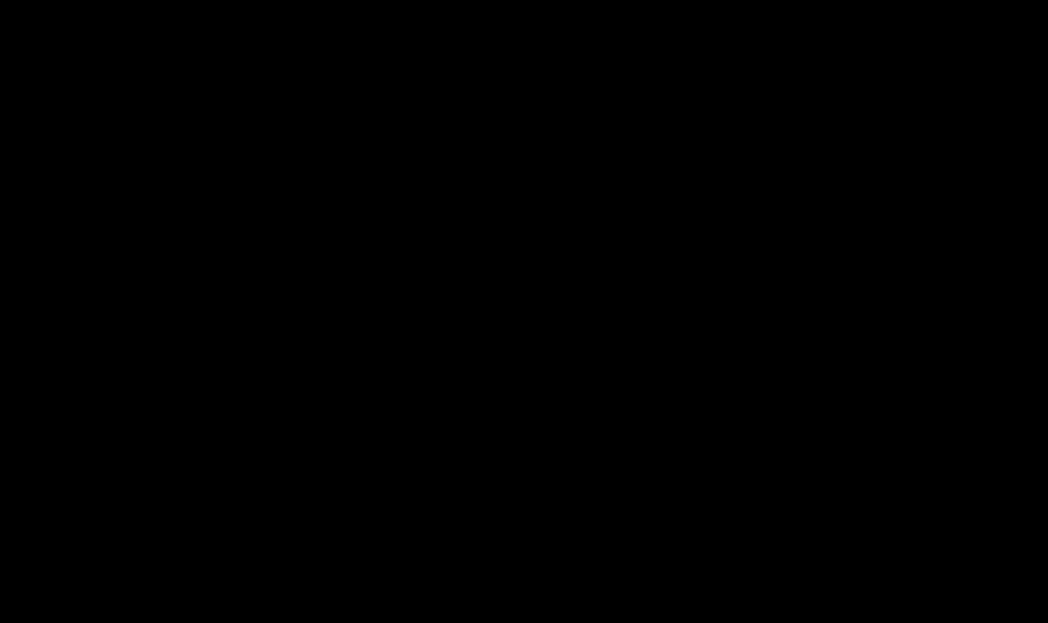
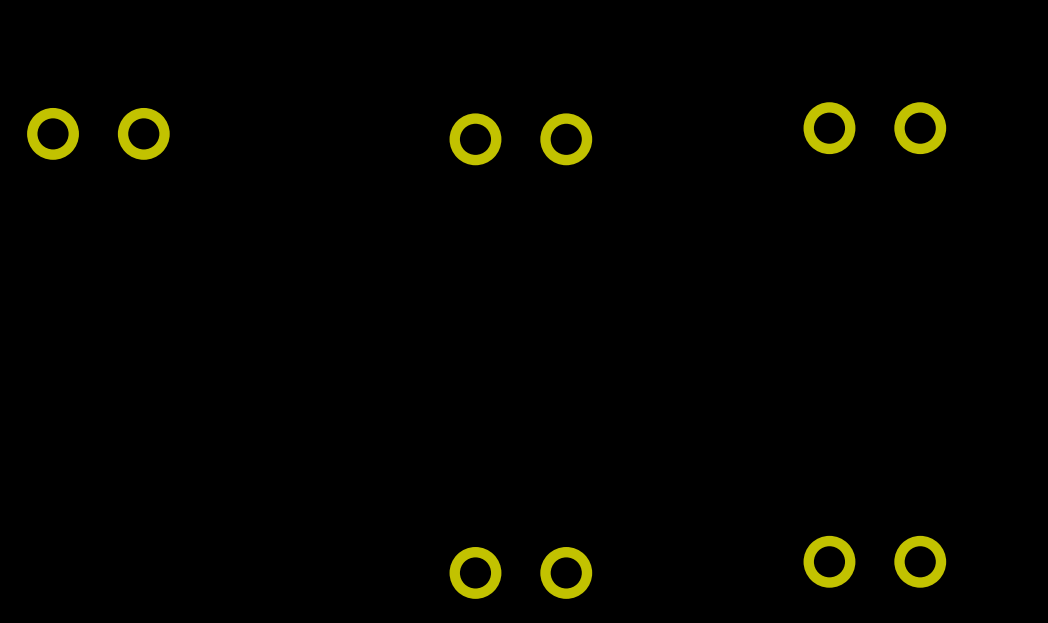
part: none -> (874, 128)
part: none -> (98, 133)
part: none -> (520, 139)
part: none -> (874, 561)
part: none -> (520, 572)

